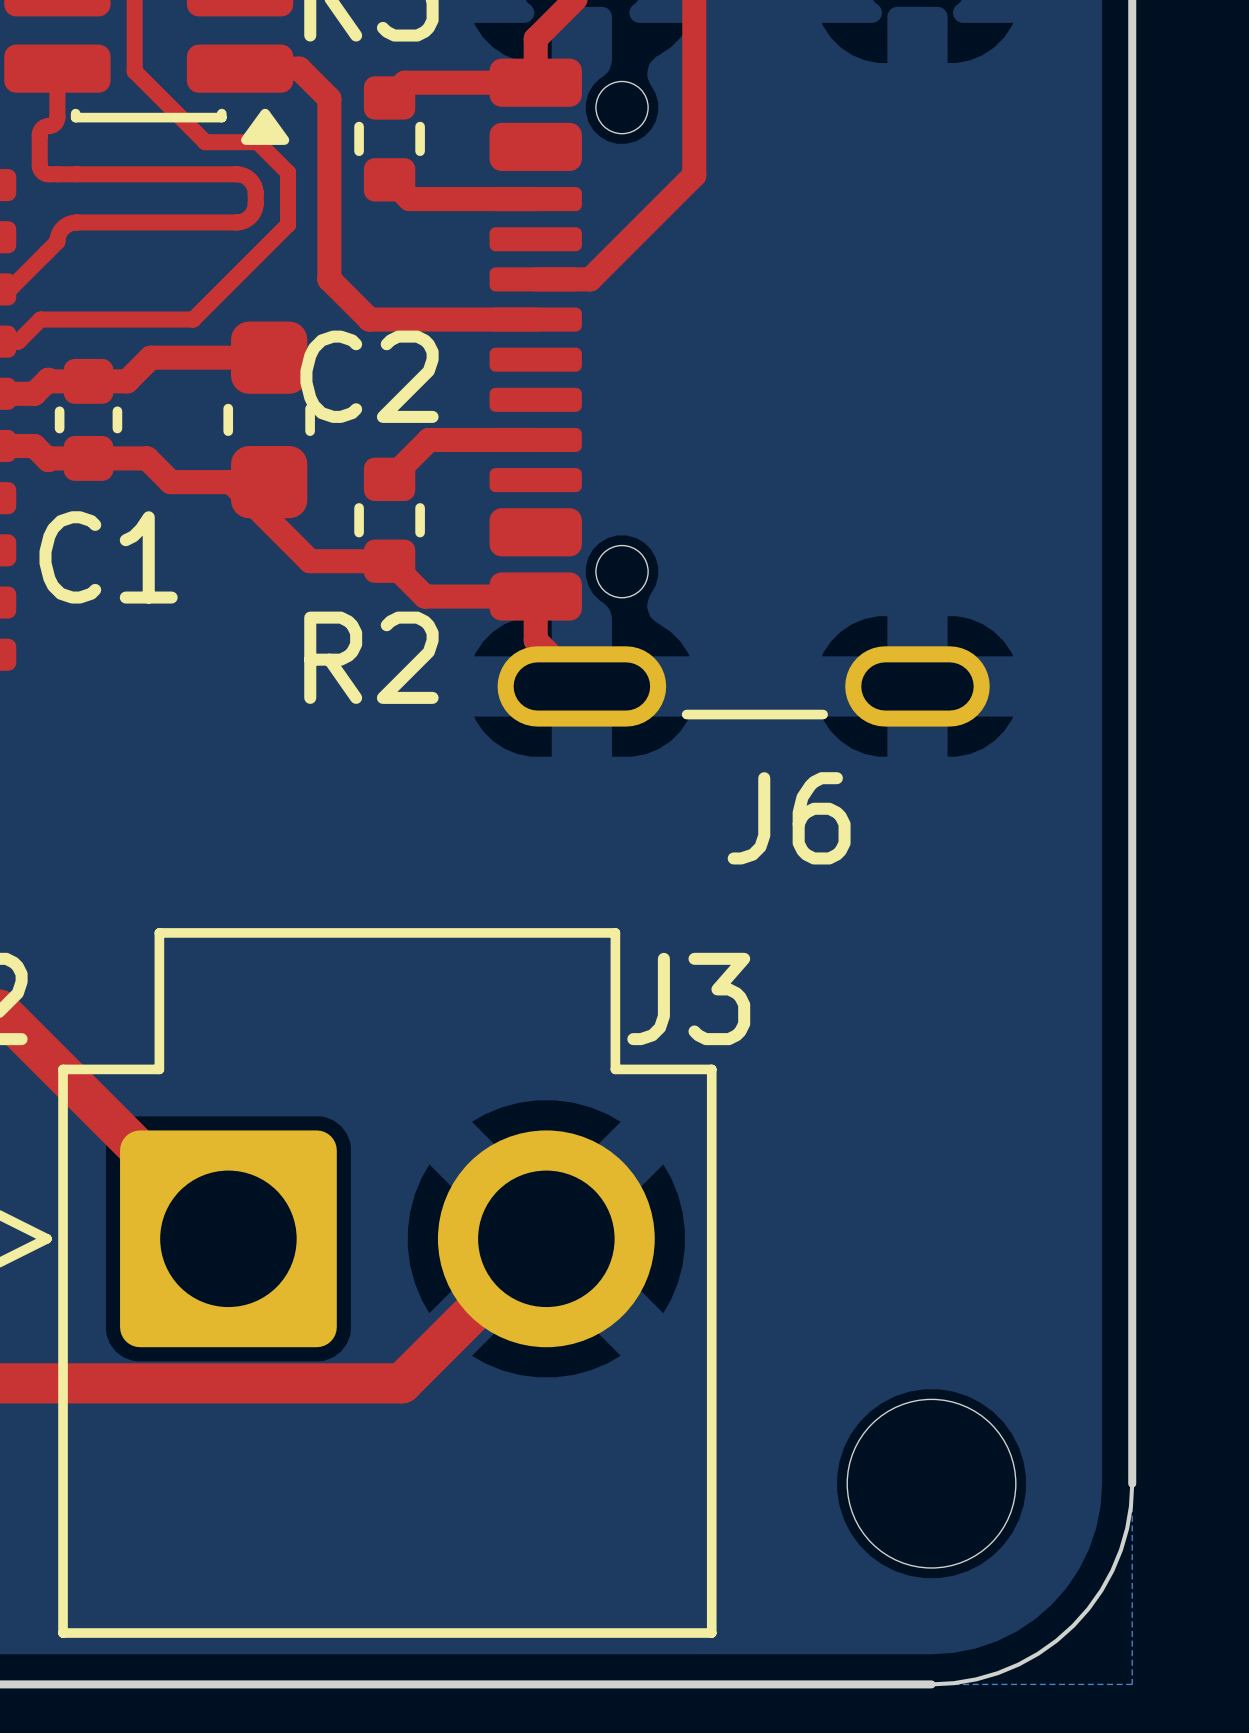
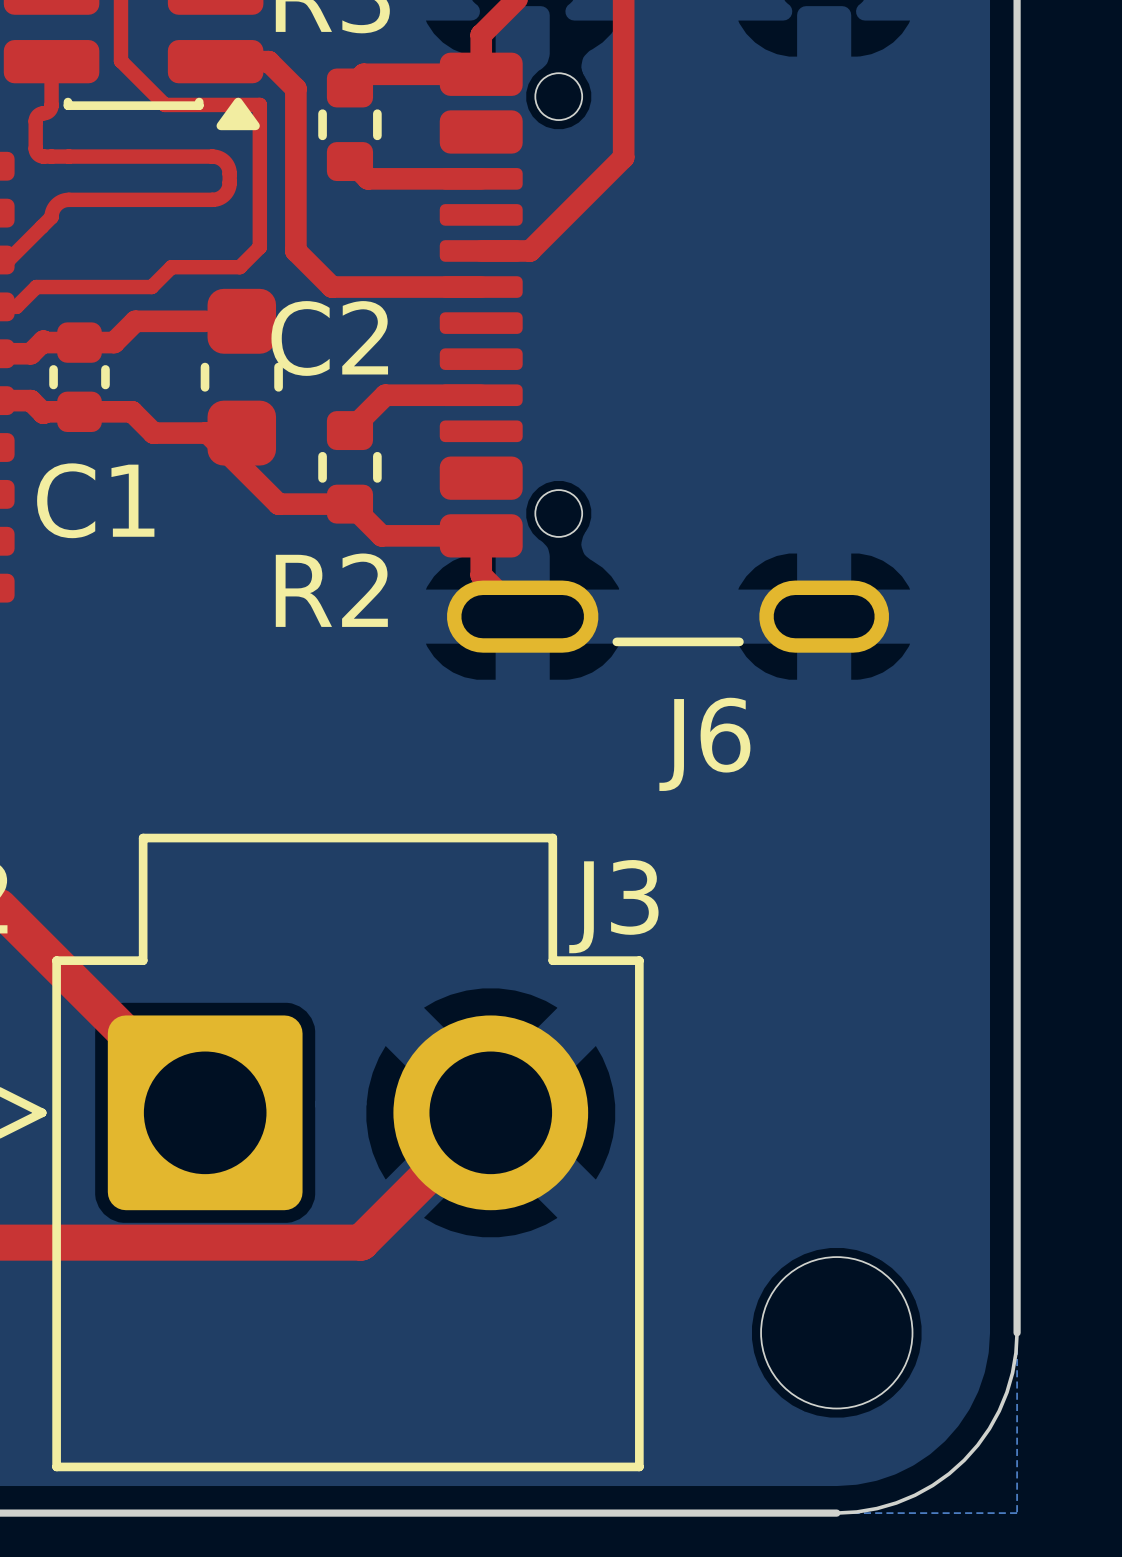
top track: (134, 67) (134, 71) (205, 142) (257, 142) (288, 172) (288, 224) (193, 319) (168, 319) -> (120, 60) (164, 104) (259, 104) (259, 247) (239, 267) (171, 267) (151, 287)

